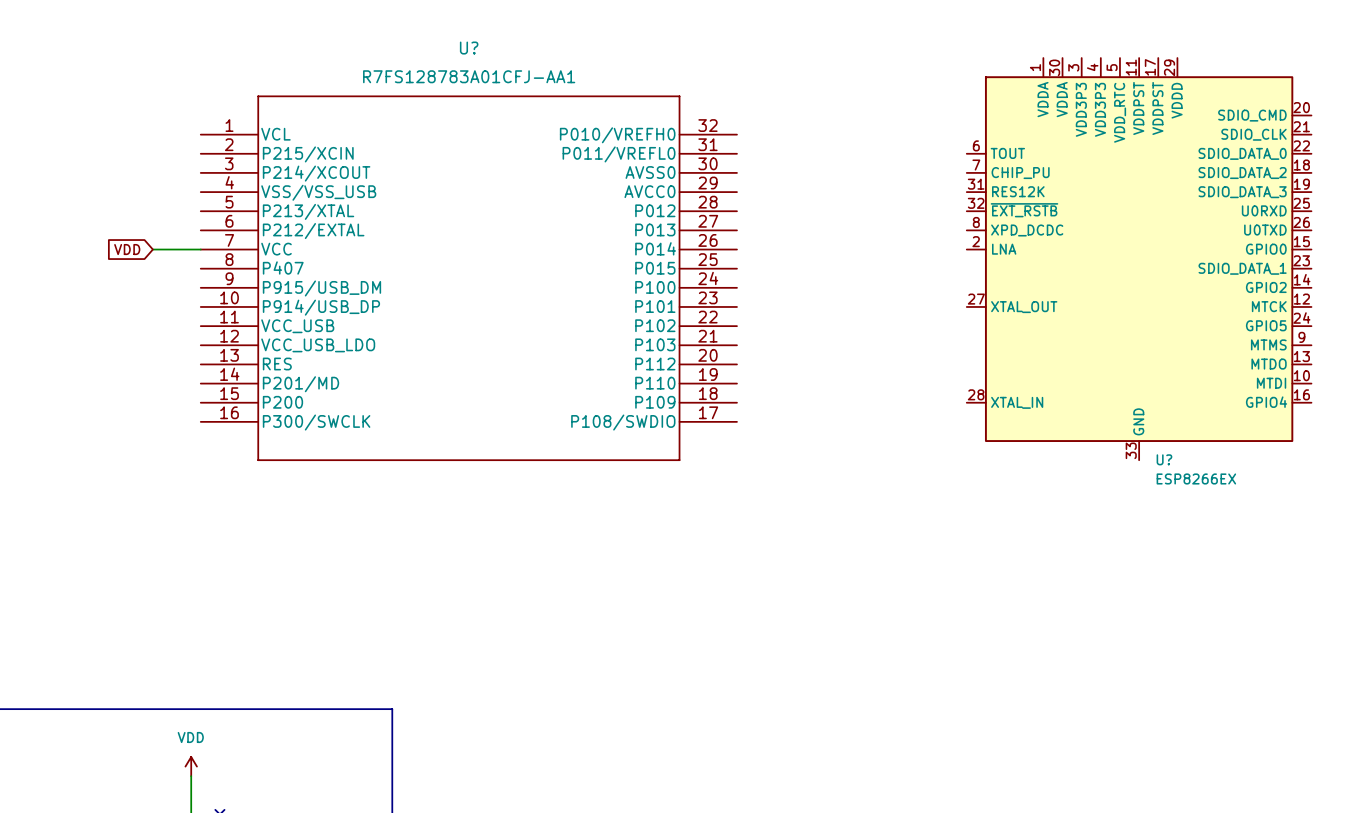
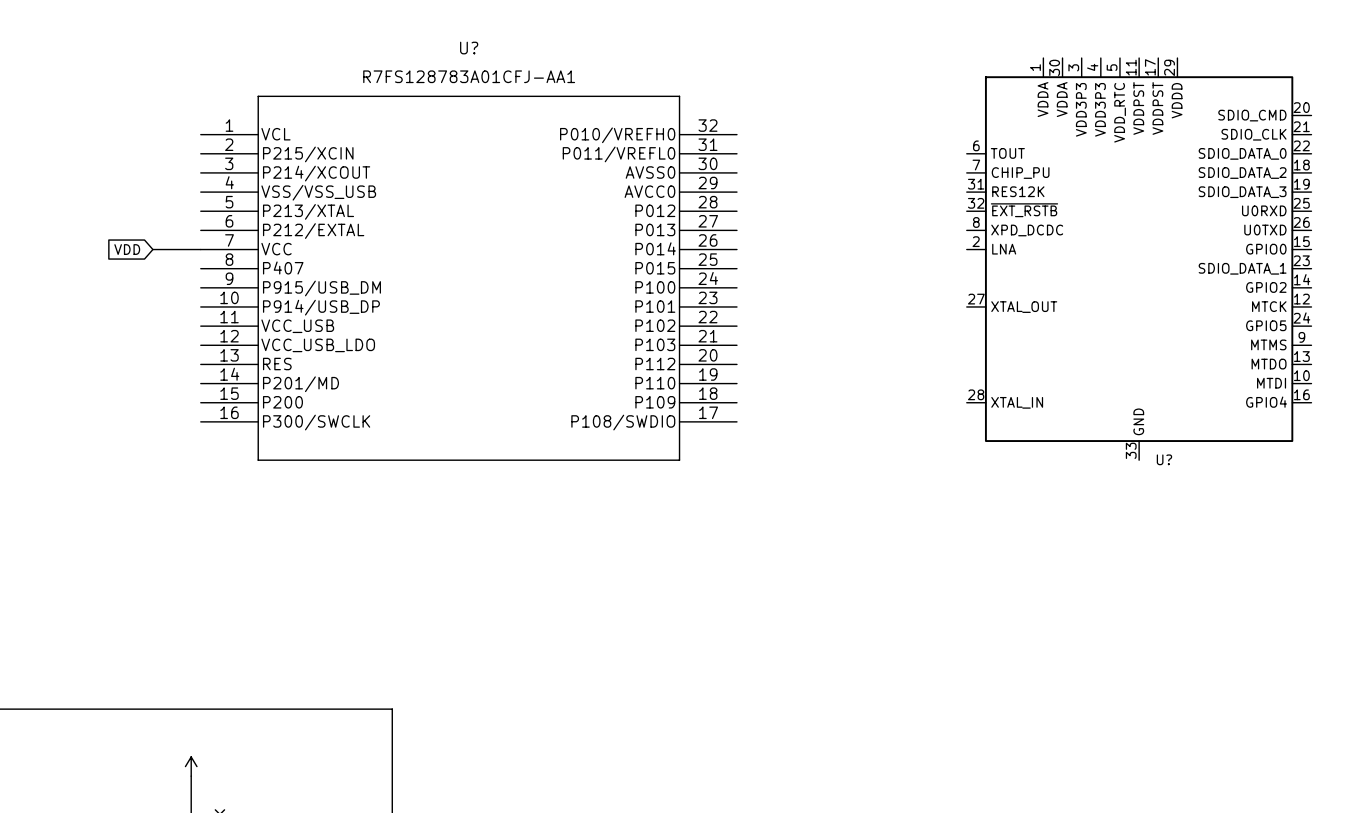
U? value: ESP8266EX (1196, 478) -> none
power symbol text: VDD (190, 737) -> none

